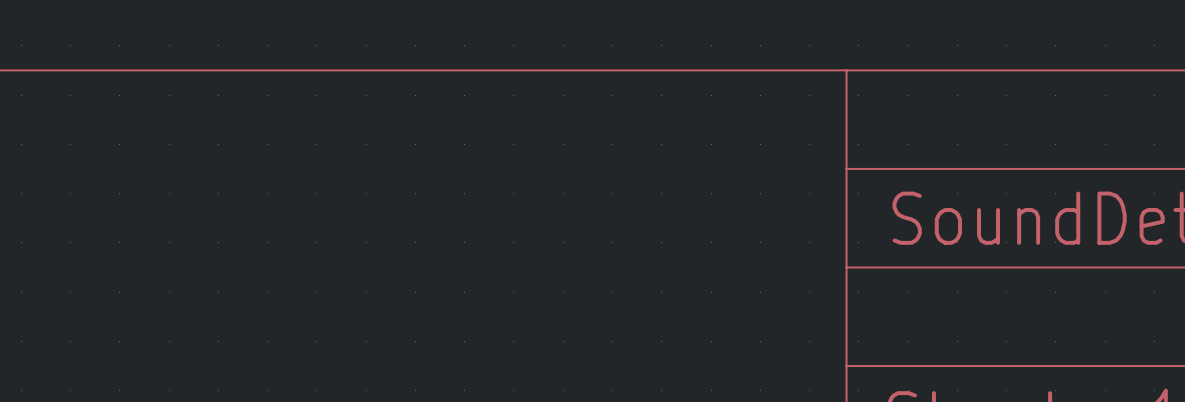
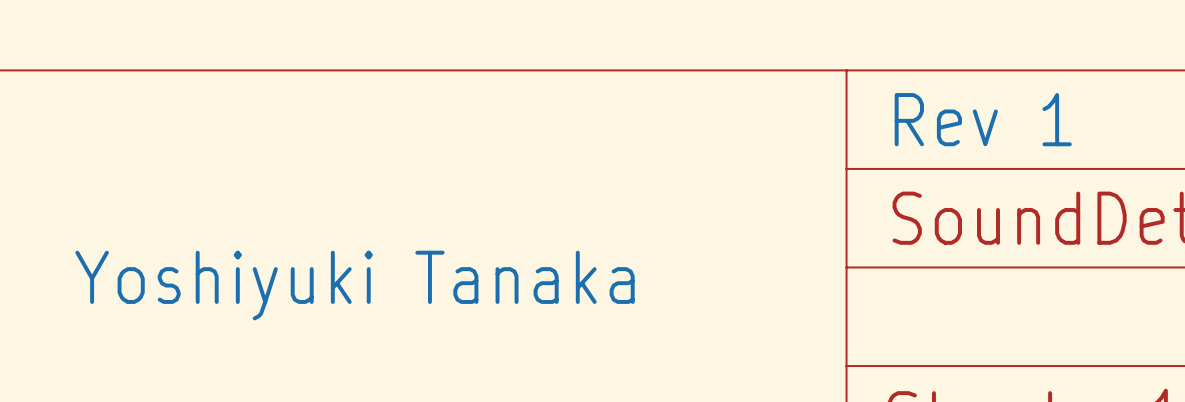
text: none -> Rev 1 (983, 119)
text: none -> Yoshiyuki Tanaka (355, 285)

